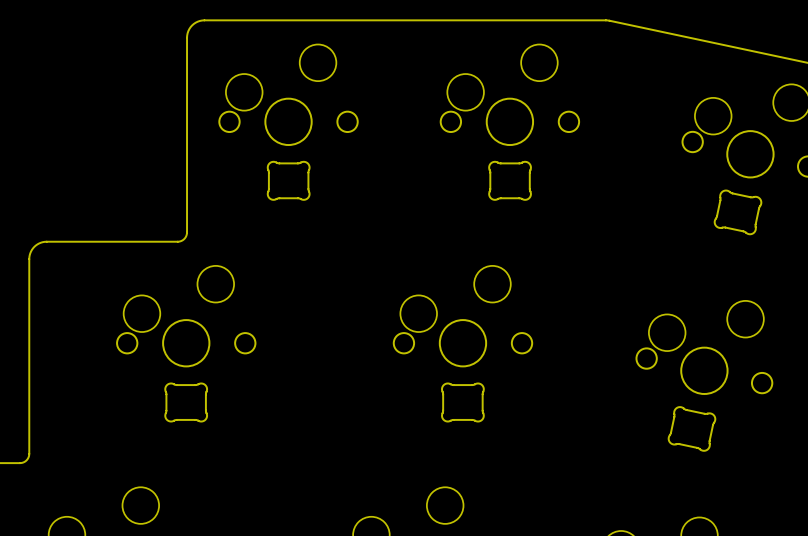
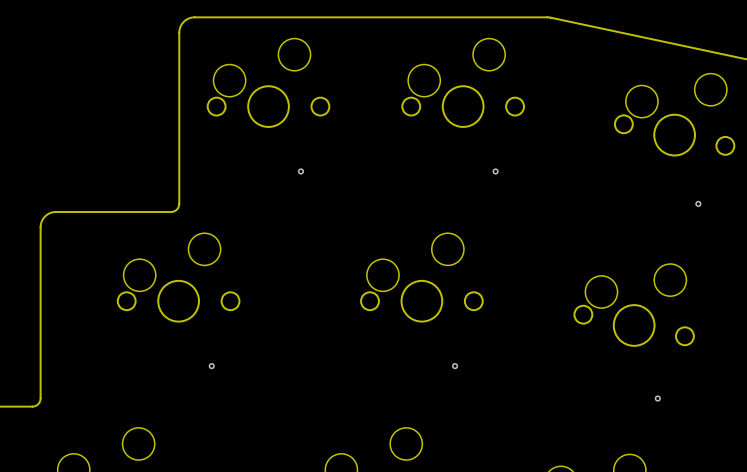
part: (288, 180) -> none
part: (510, 180) -> none
via: none -> (300, 171)
via: none -> (495, 171)
part: (738, 212) -> none
via: none -> (698, 203)
part: (186, 402) -> none
part: (462, 402) -> none
via: none -> (211, 366)
via: none -> (455, 366)
part: (691, 428) -> none
via: none -> (657, 398)

